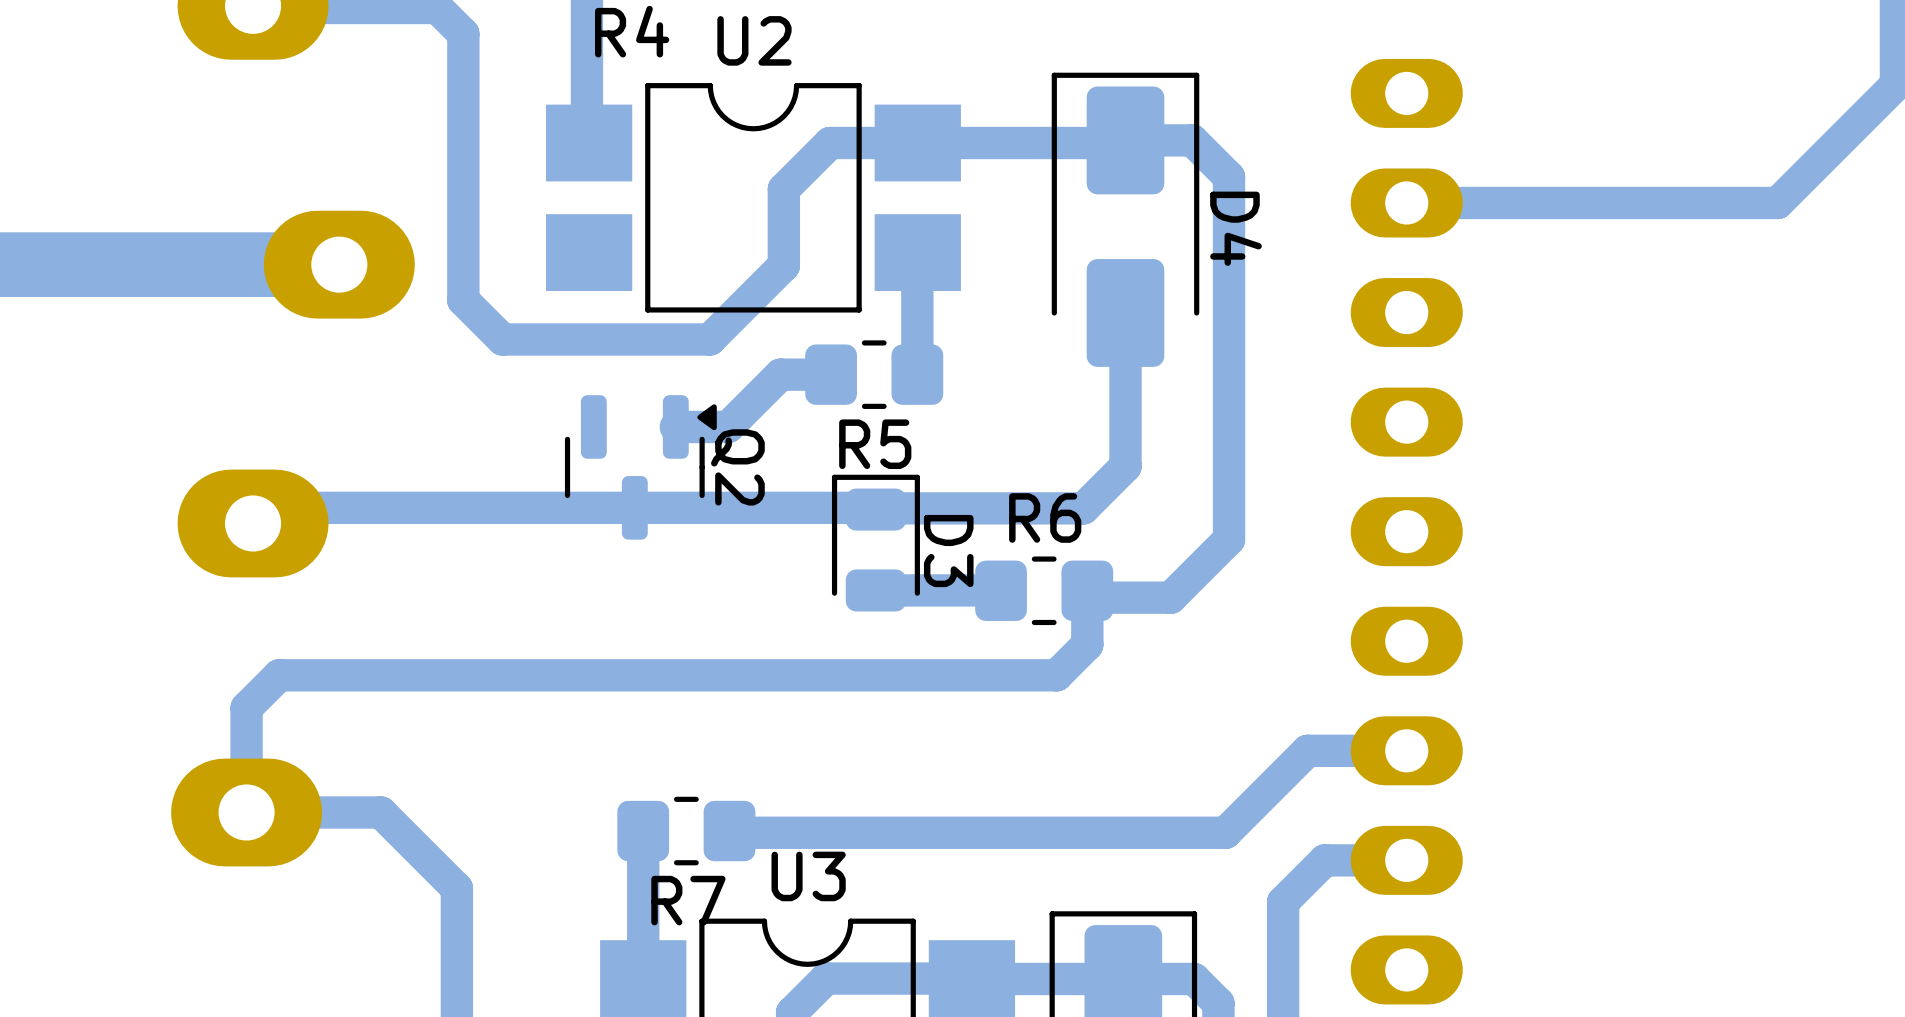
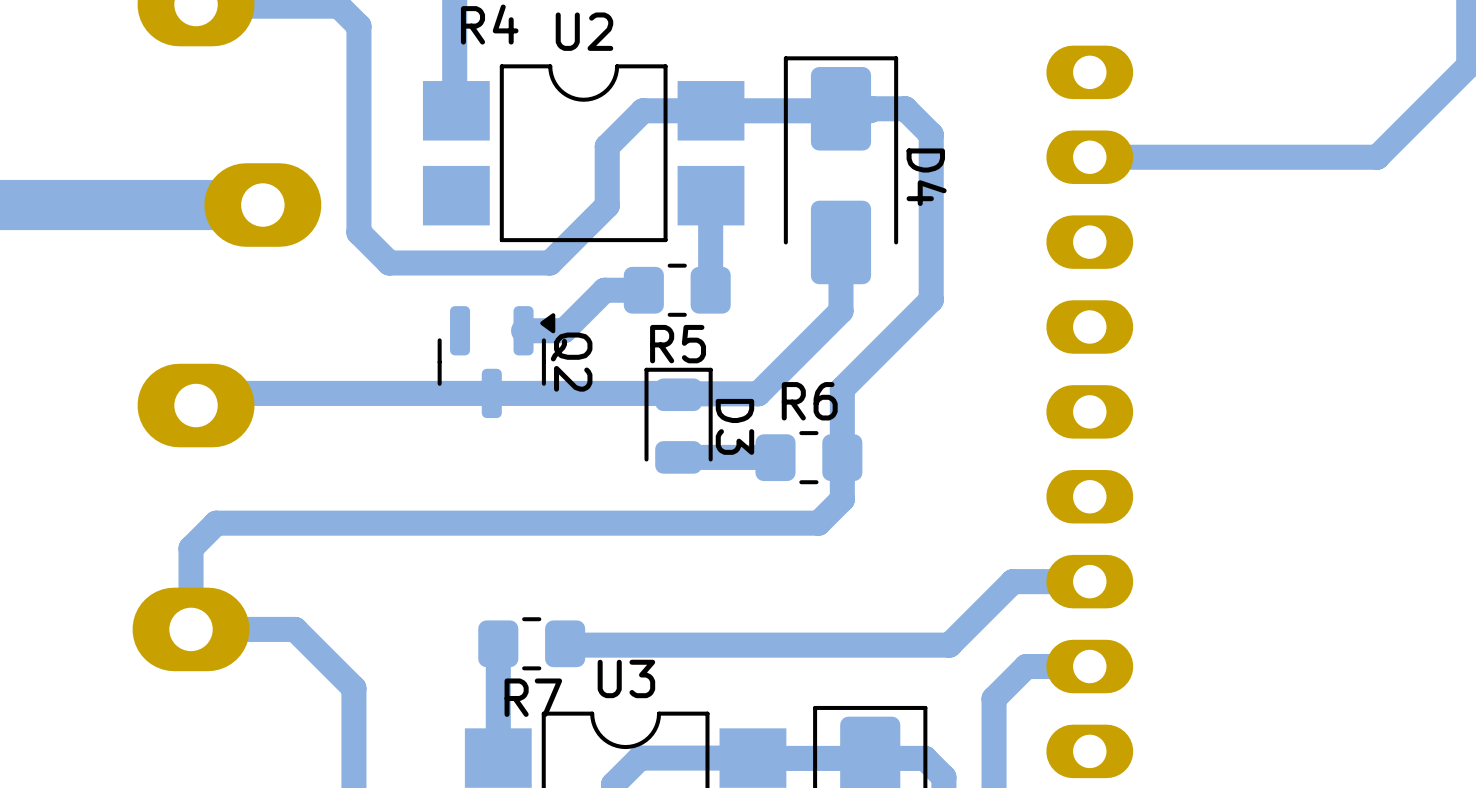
track: (1168, 140) (1192, 140) (1229, 177) (1229, 539) (1170, 597) (1081, 597) -> (905, 108) (931, 134) (931, 300) (842, 388) (842, 458) (837, 463)
D4 position: (1125, 219) -> (840, 170)
track: (1125, 312) (1125, 466) (1083, 508) (978, 508) -> (840, 242) (840, 311) (758, 393)

